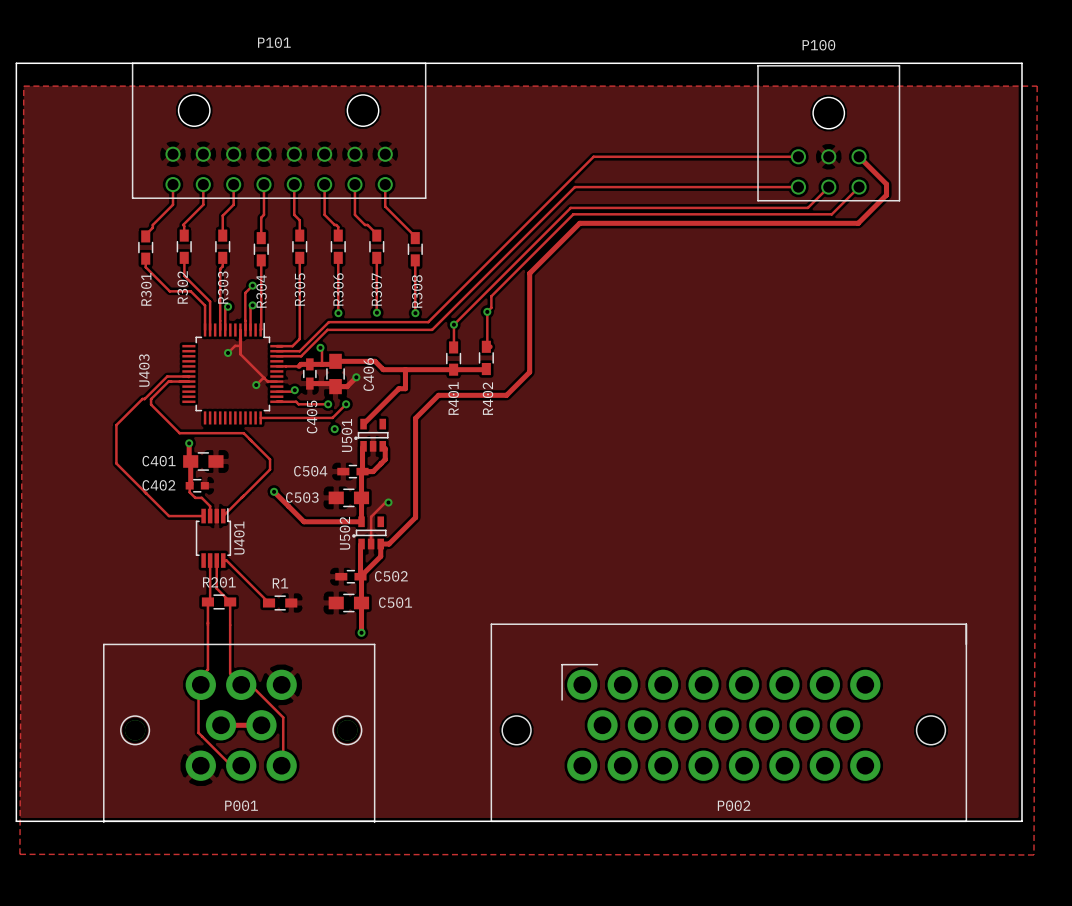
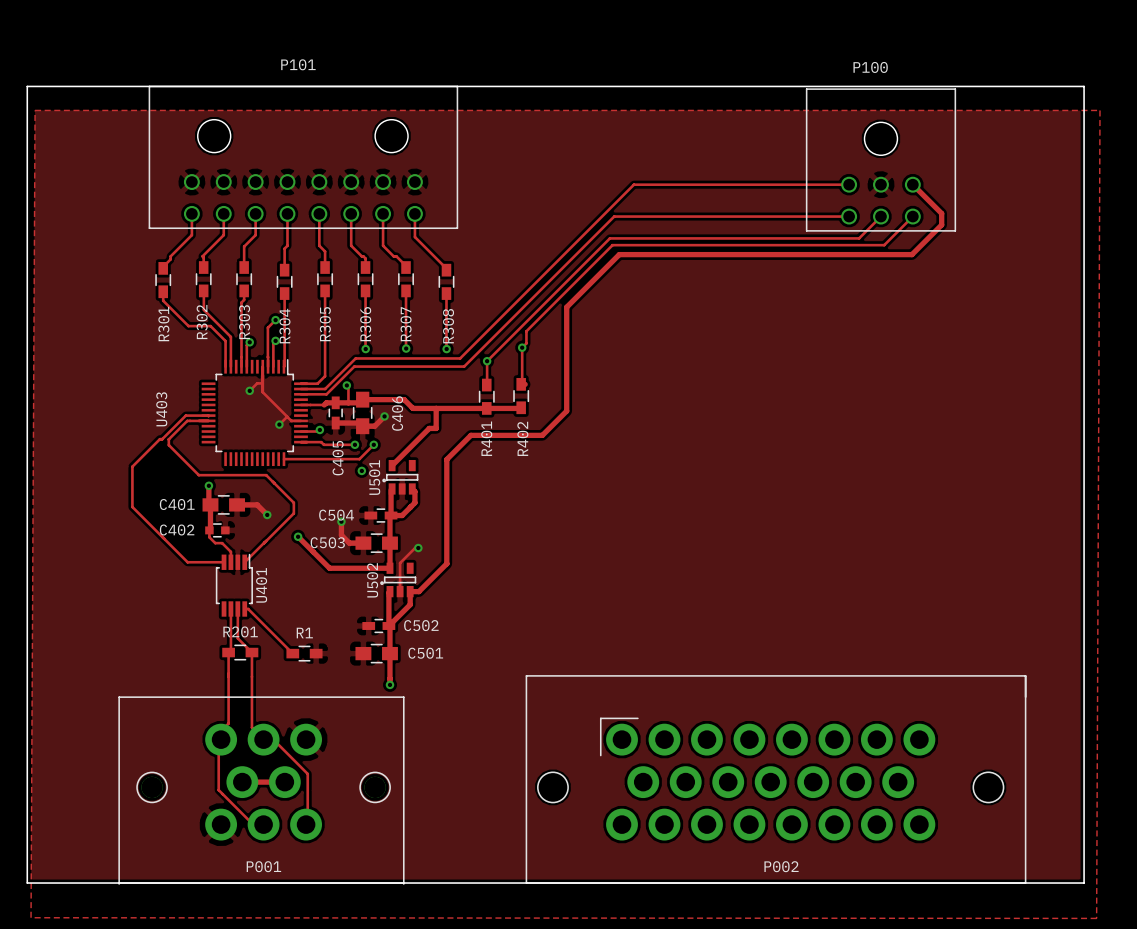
track: none -> (237, 504) (257, 504) (267, 514)
via: none -> (267, 514)
track: none -> (341, 521) (341, 535) (349, 543) (363, 543)
via: none -> (341, 521)

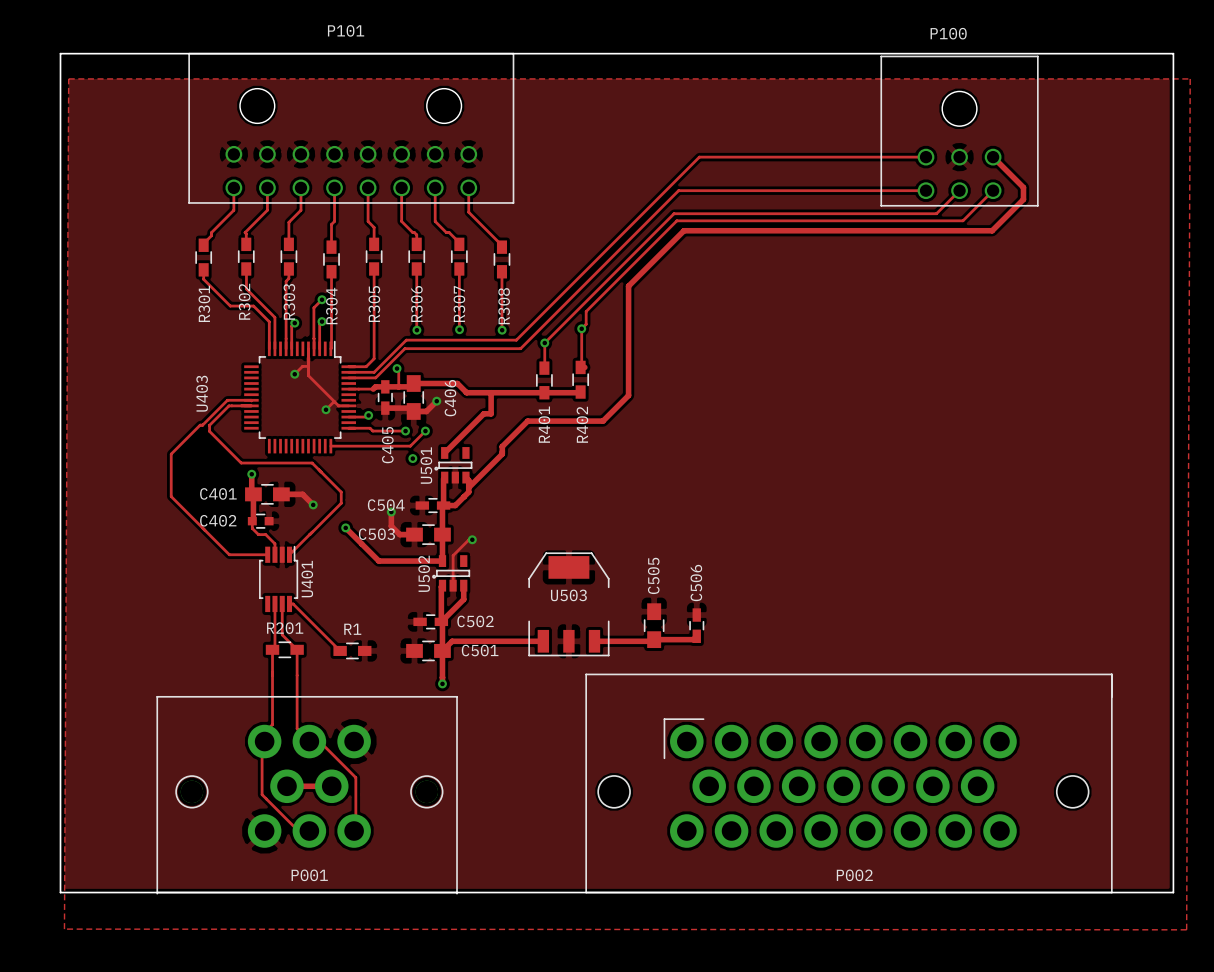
track: (446, 466) (446, 563) (418, 591) (410, 591) -> (502, 454) (468, 487)
U503: none -> (568, 604)
C505: none -> (654, 625)
C506: none -> (696, 625)
track: none -> (696, 636) (693, 639) (594, 641)
track: none -> (543, 641) (452, 641) (442, 650)

